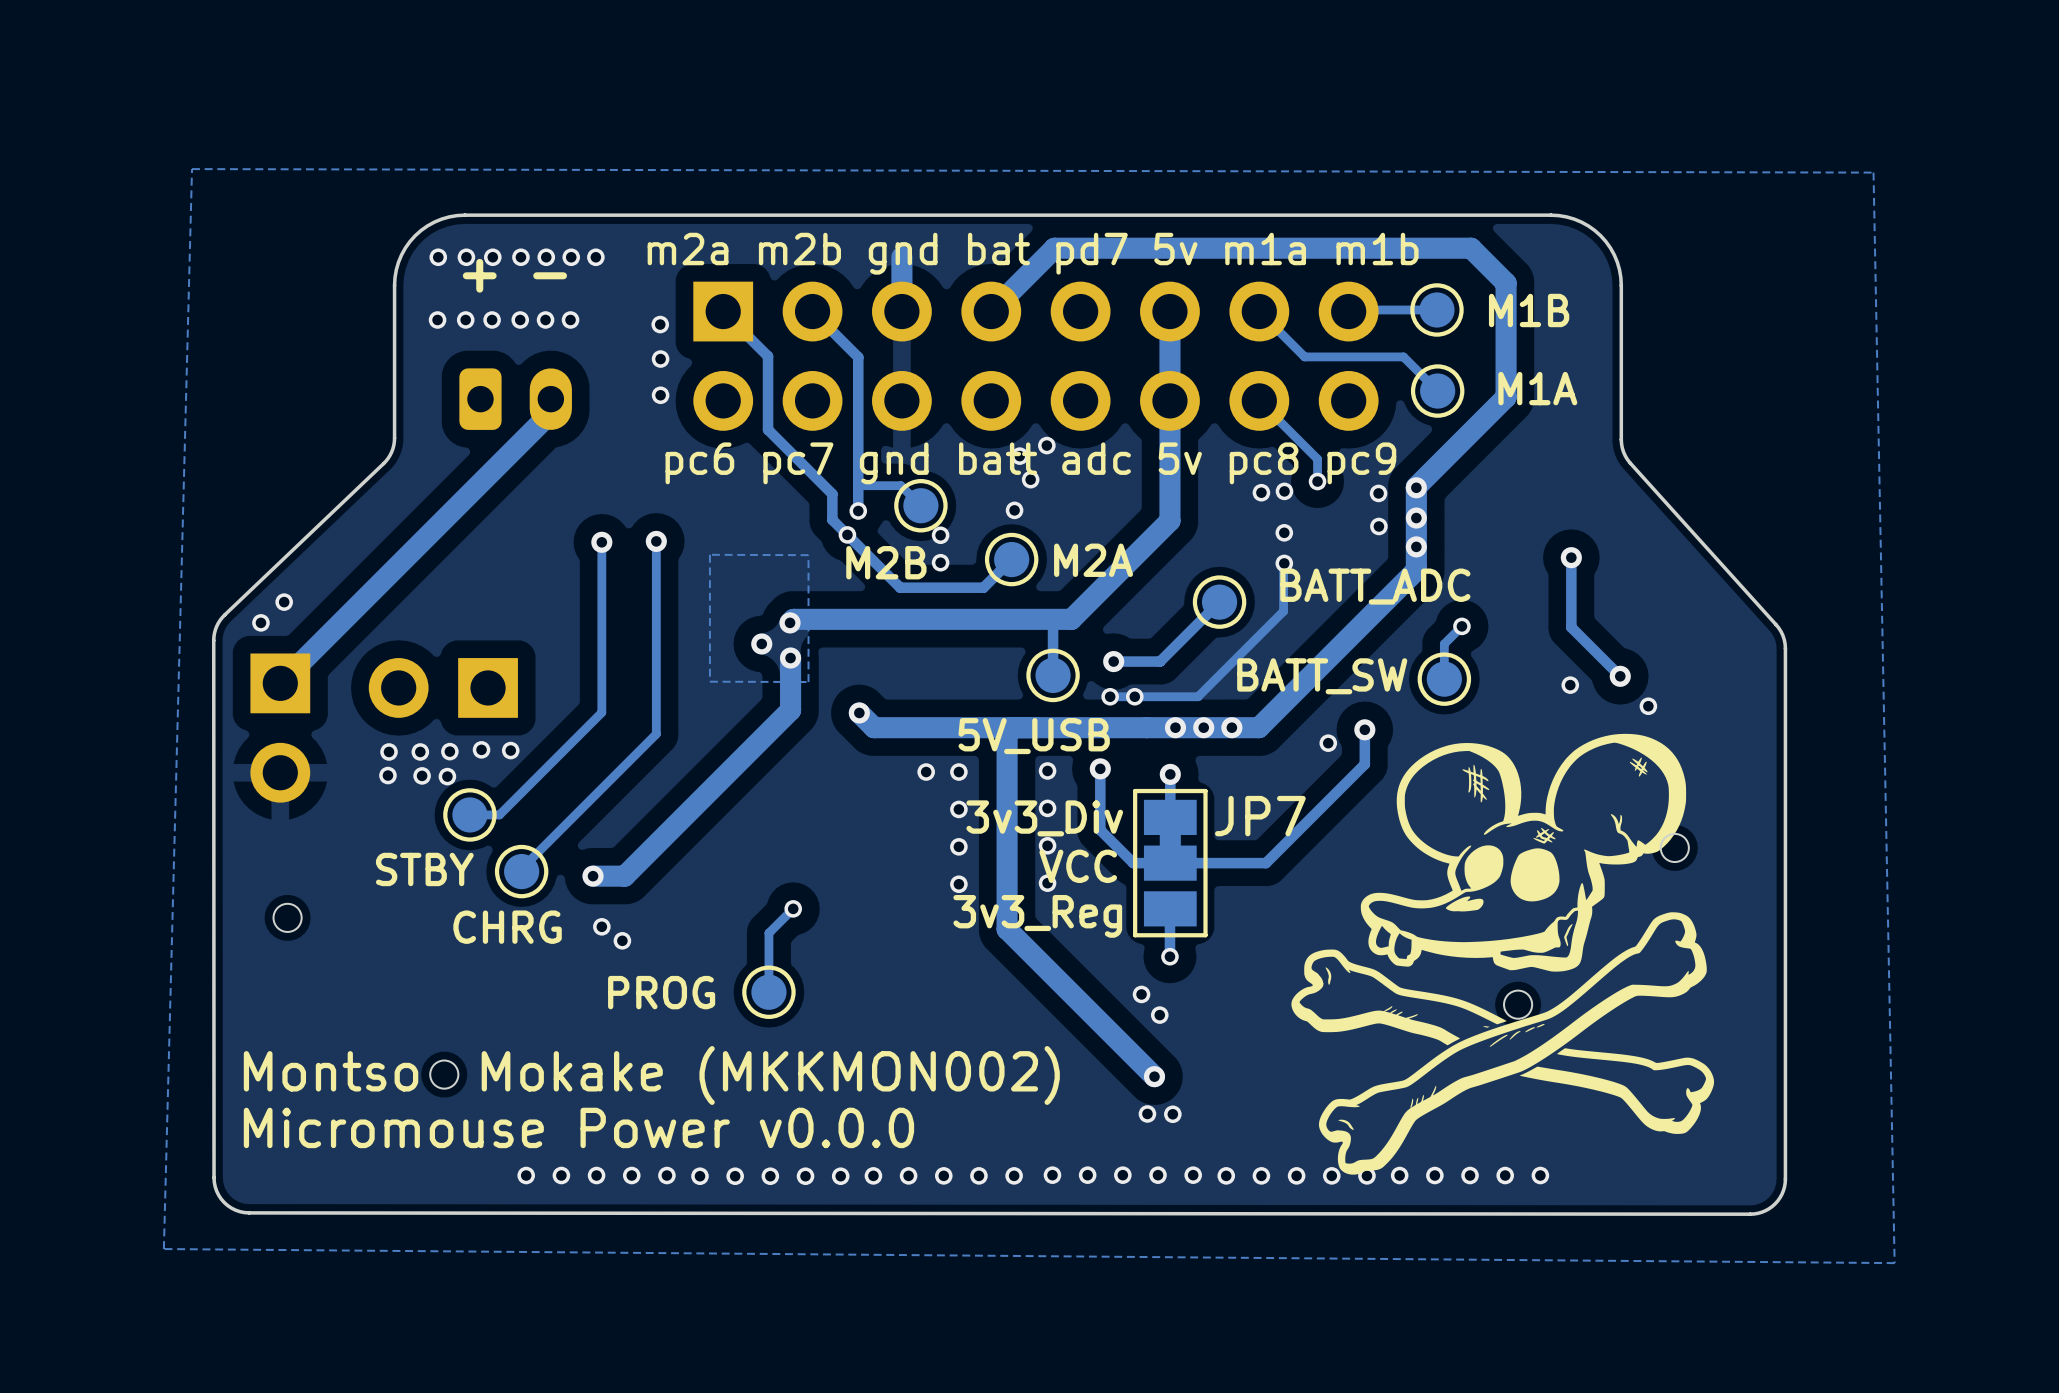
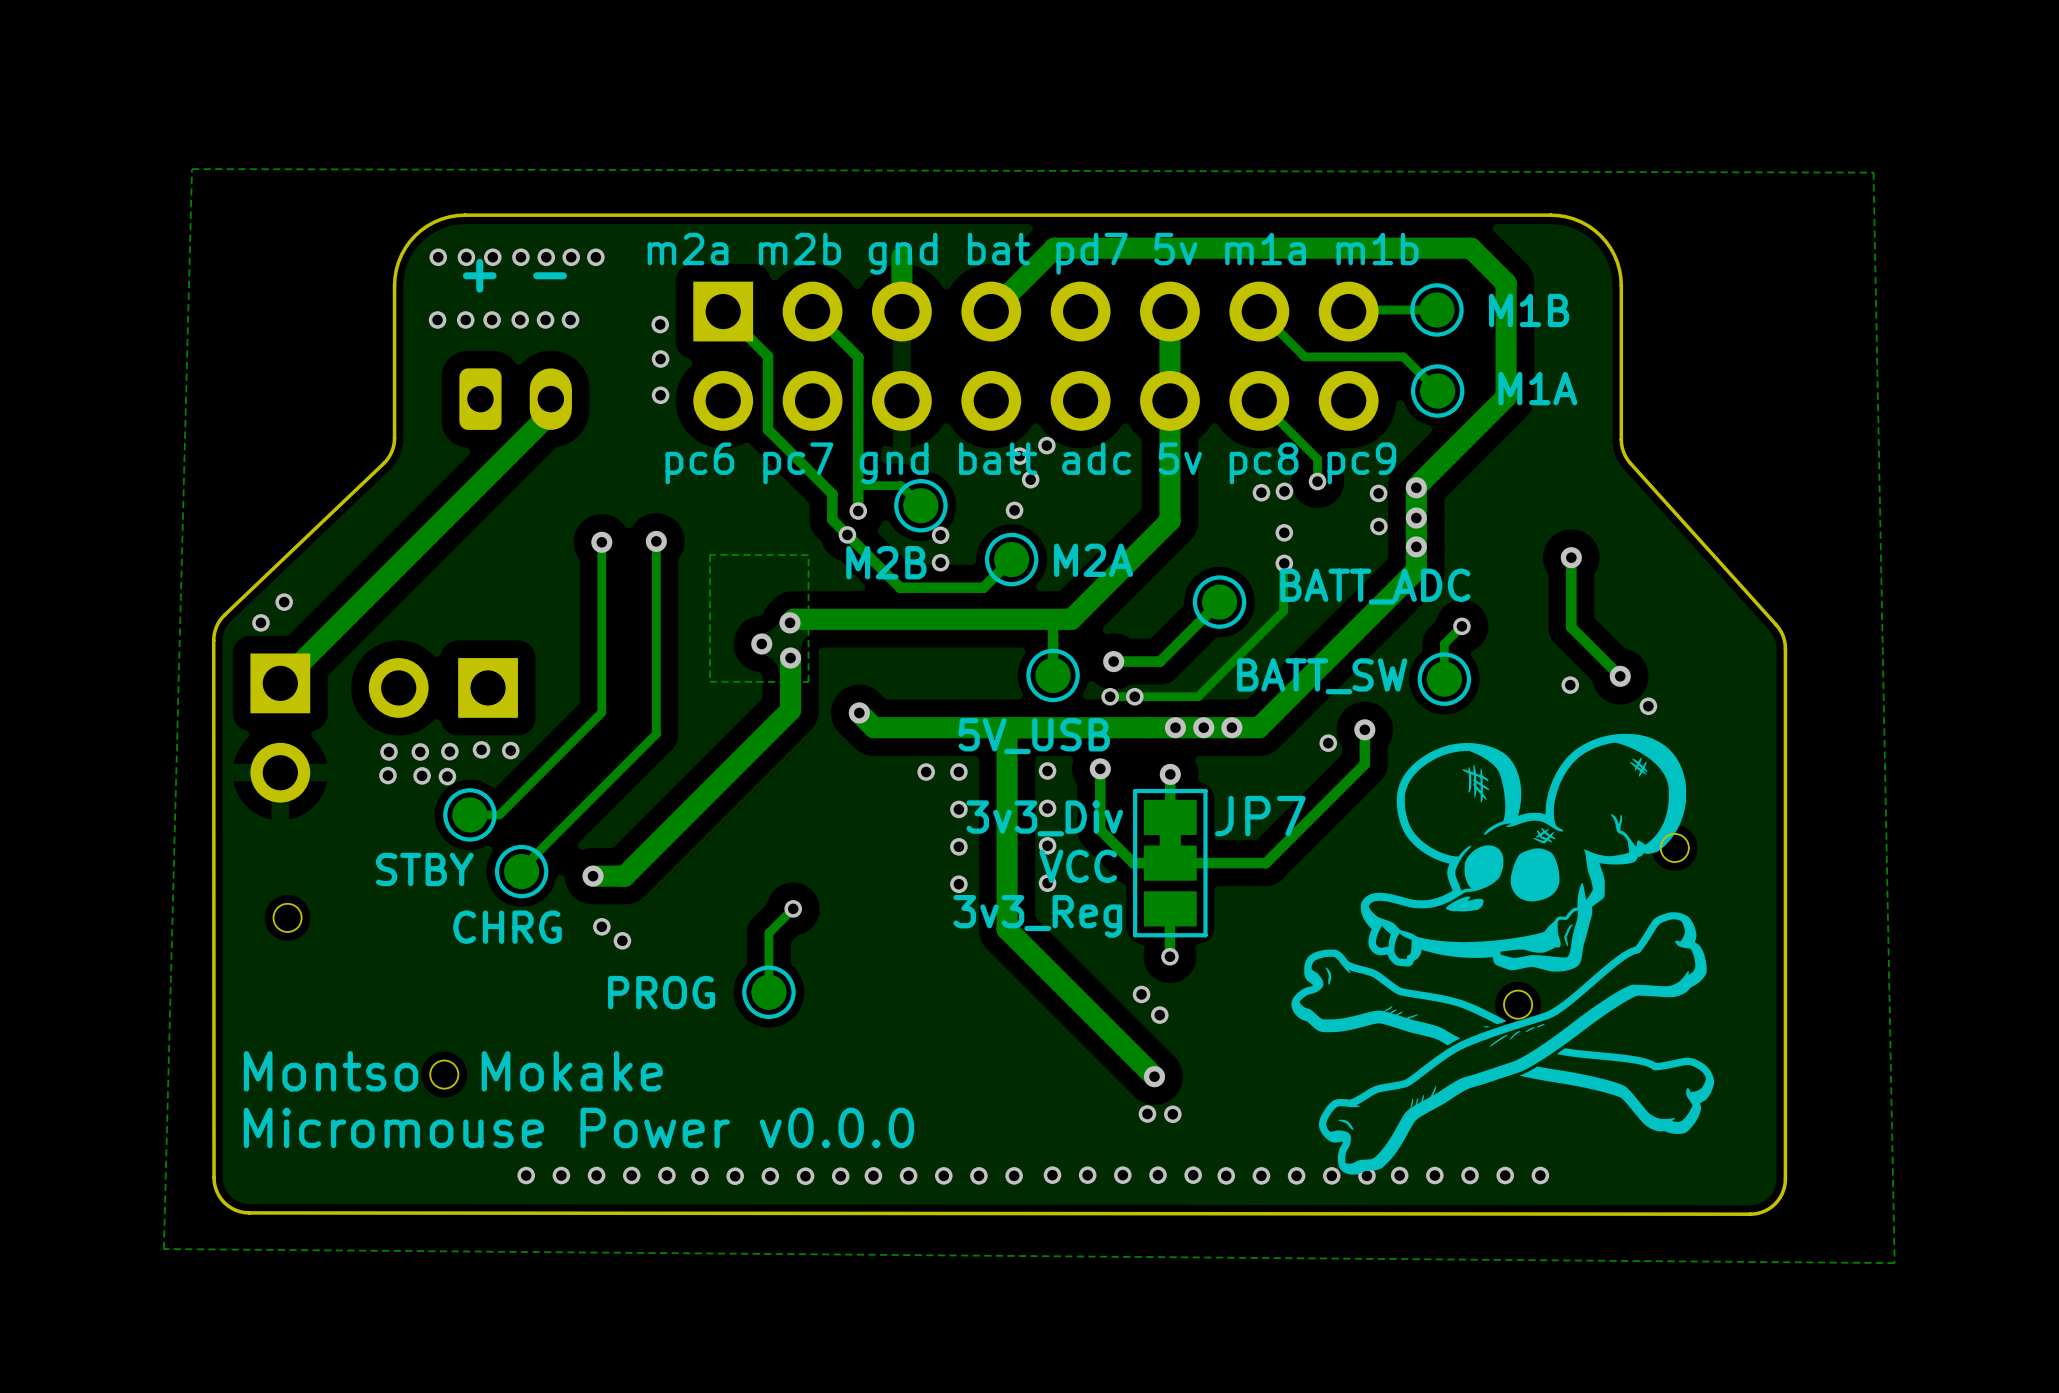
text: Montso Mokake (MKKMON002) (651, 1075) -> Montso Mokake (453, 1071)

